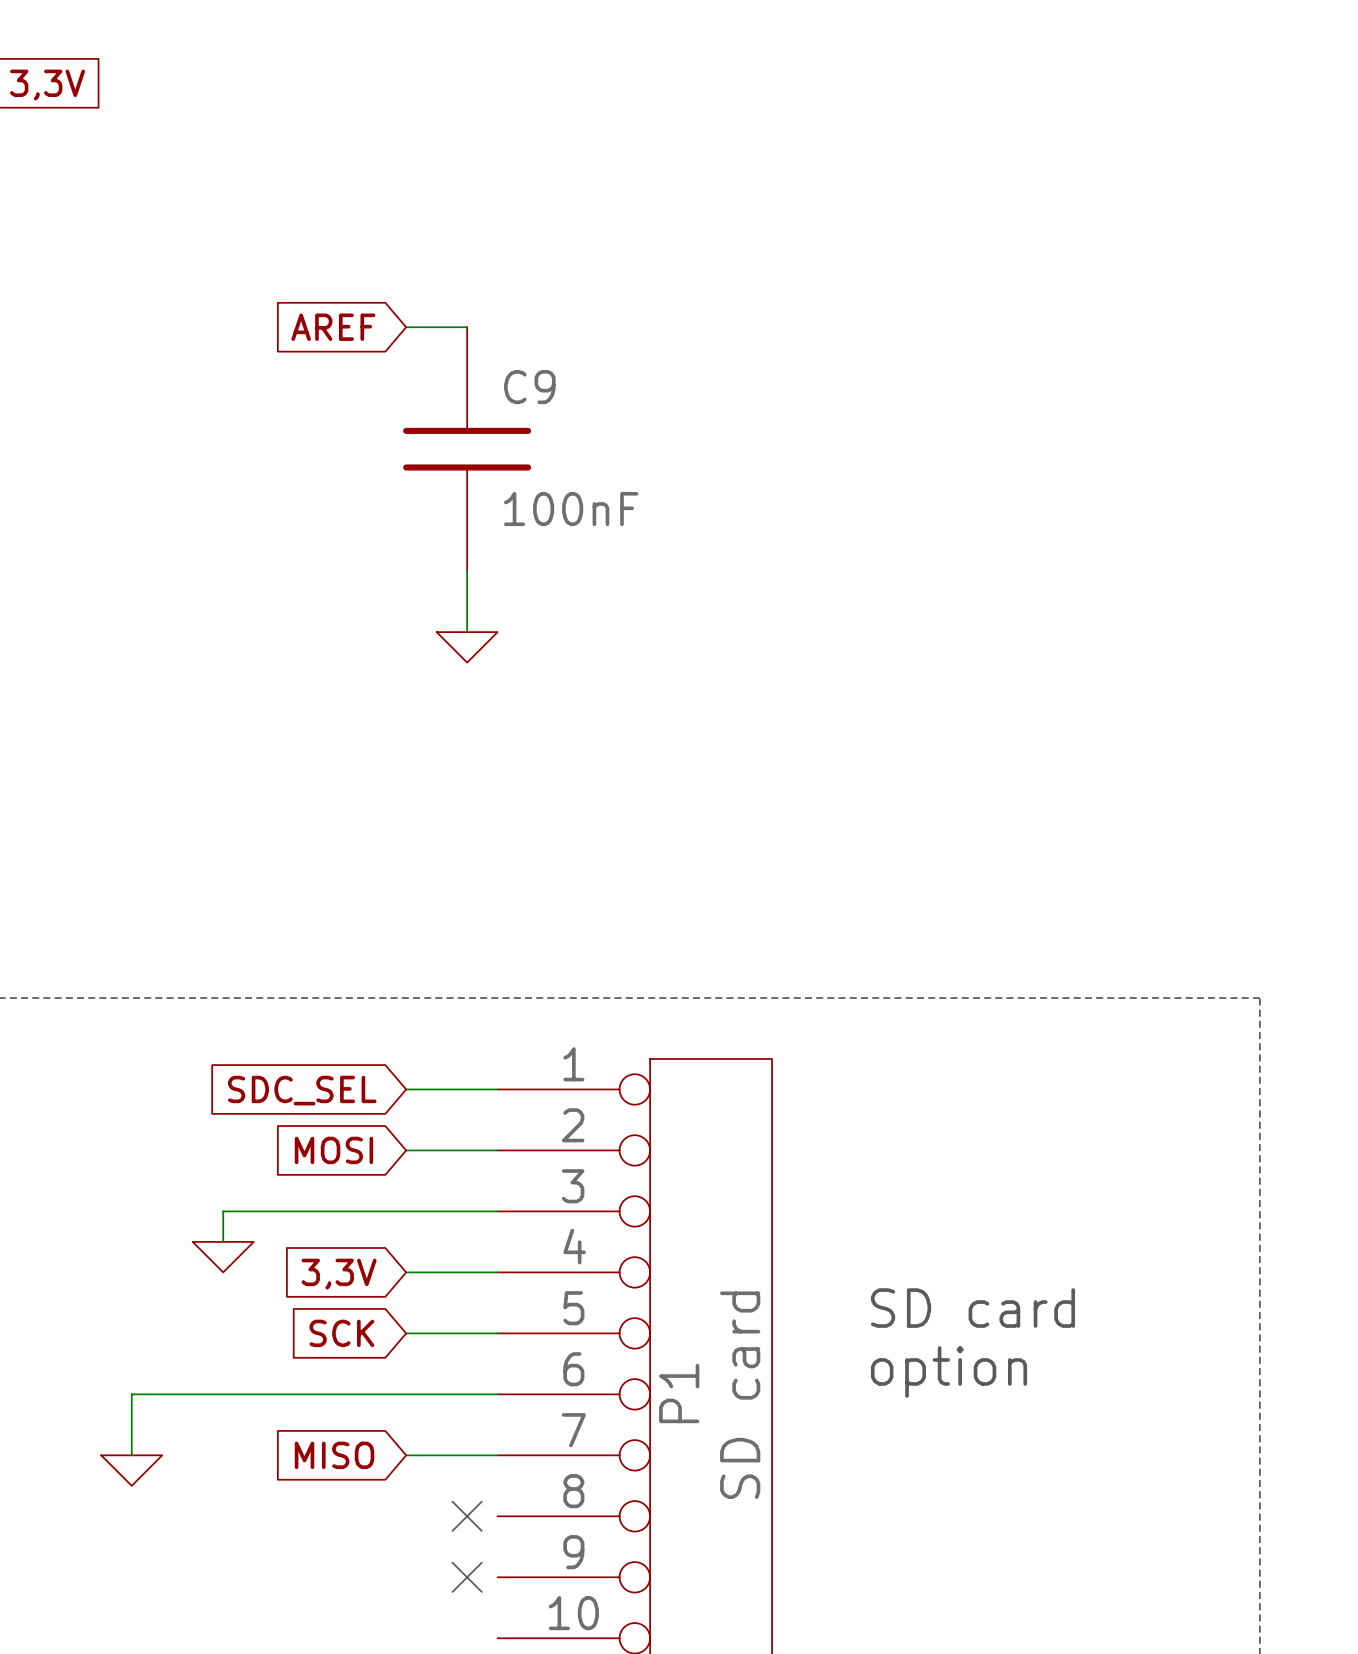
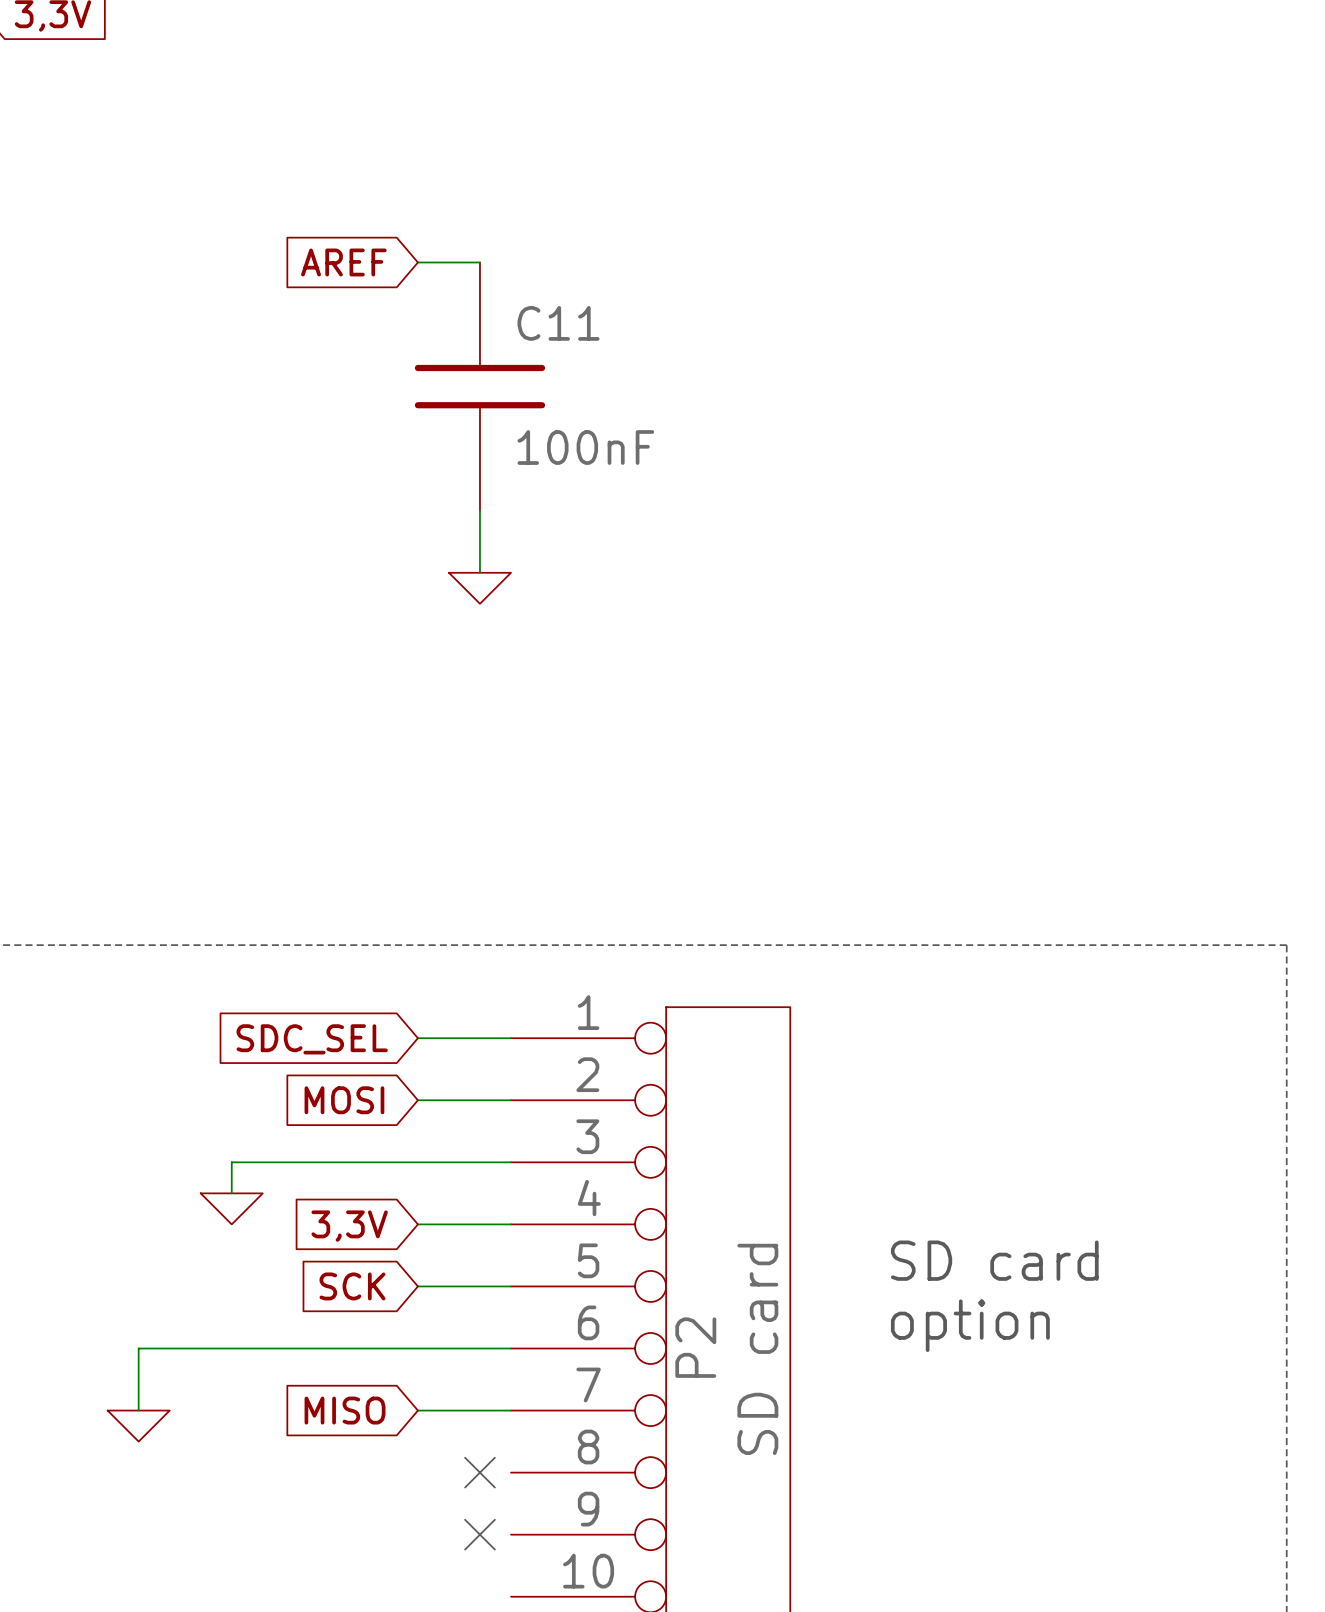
C9 name: C9 (529, 387) -> C11 (558, 323)
P1 name: P1 (679, 1393) -> P2 (695, 1347)

